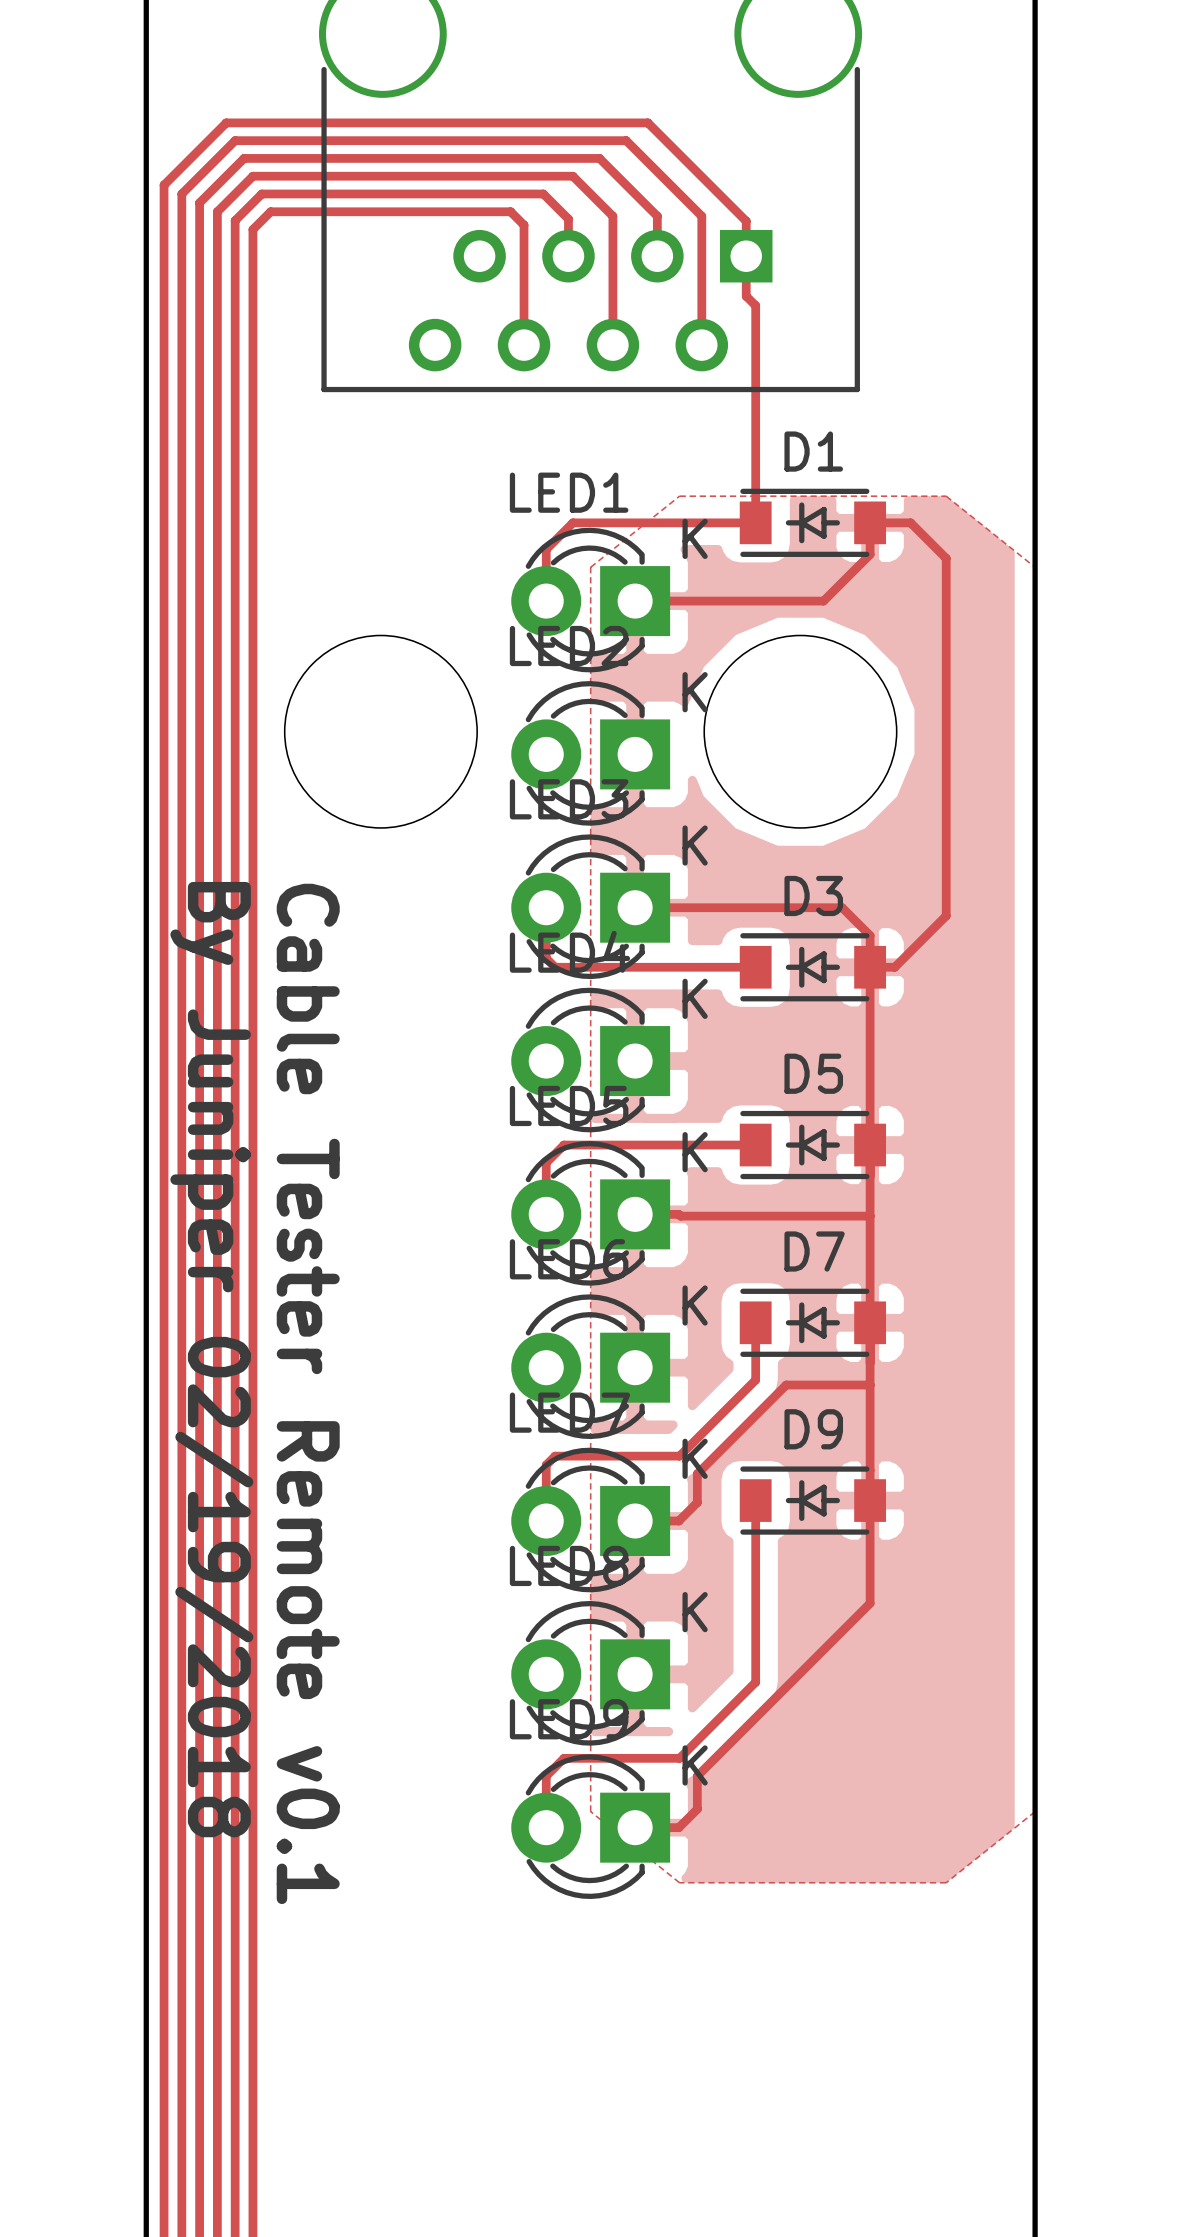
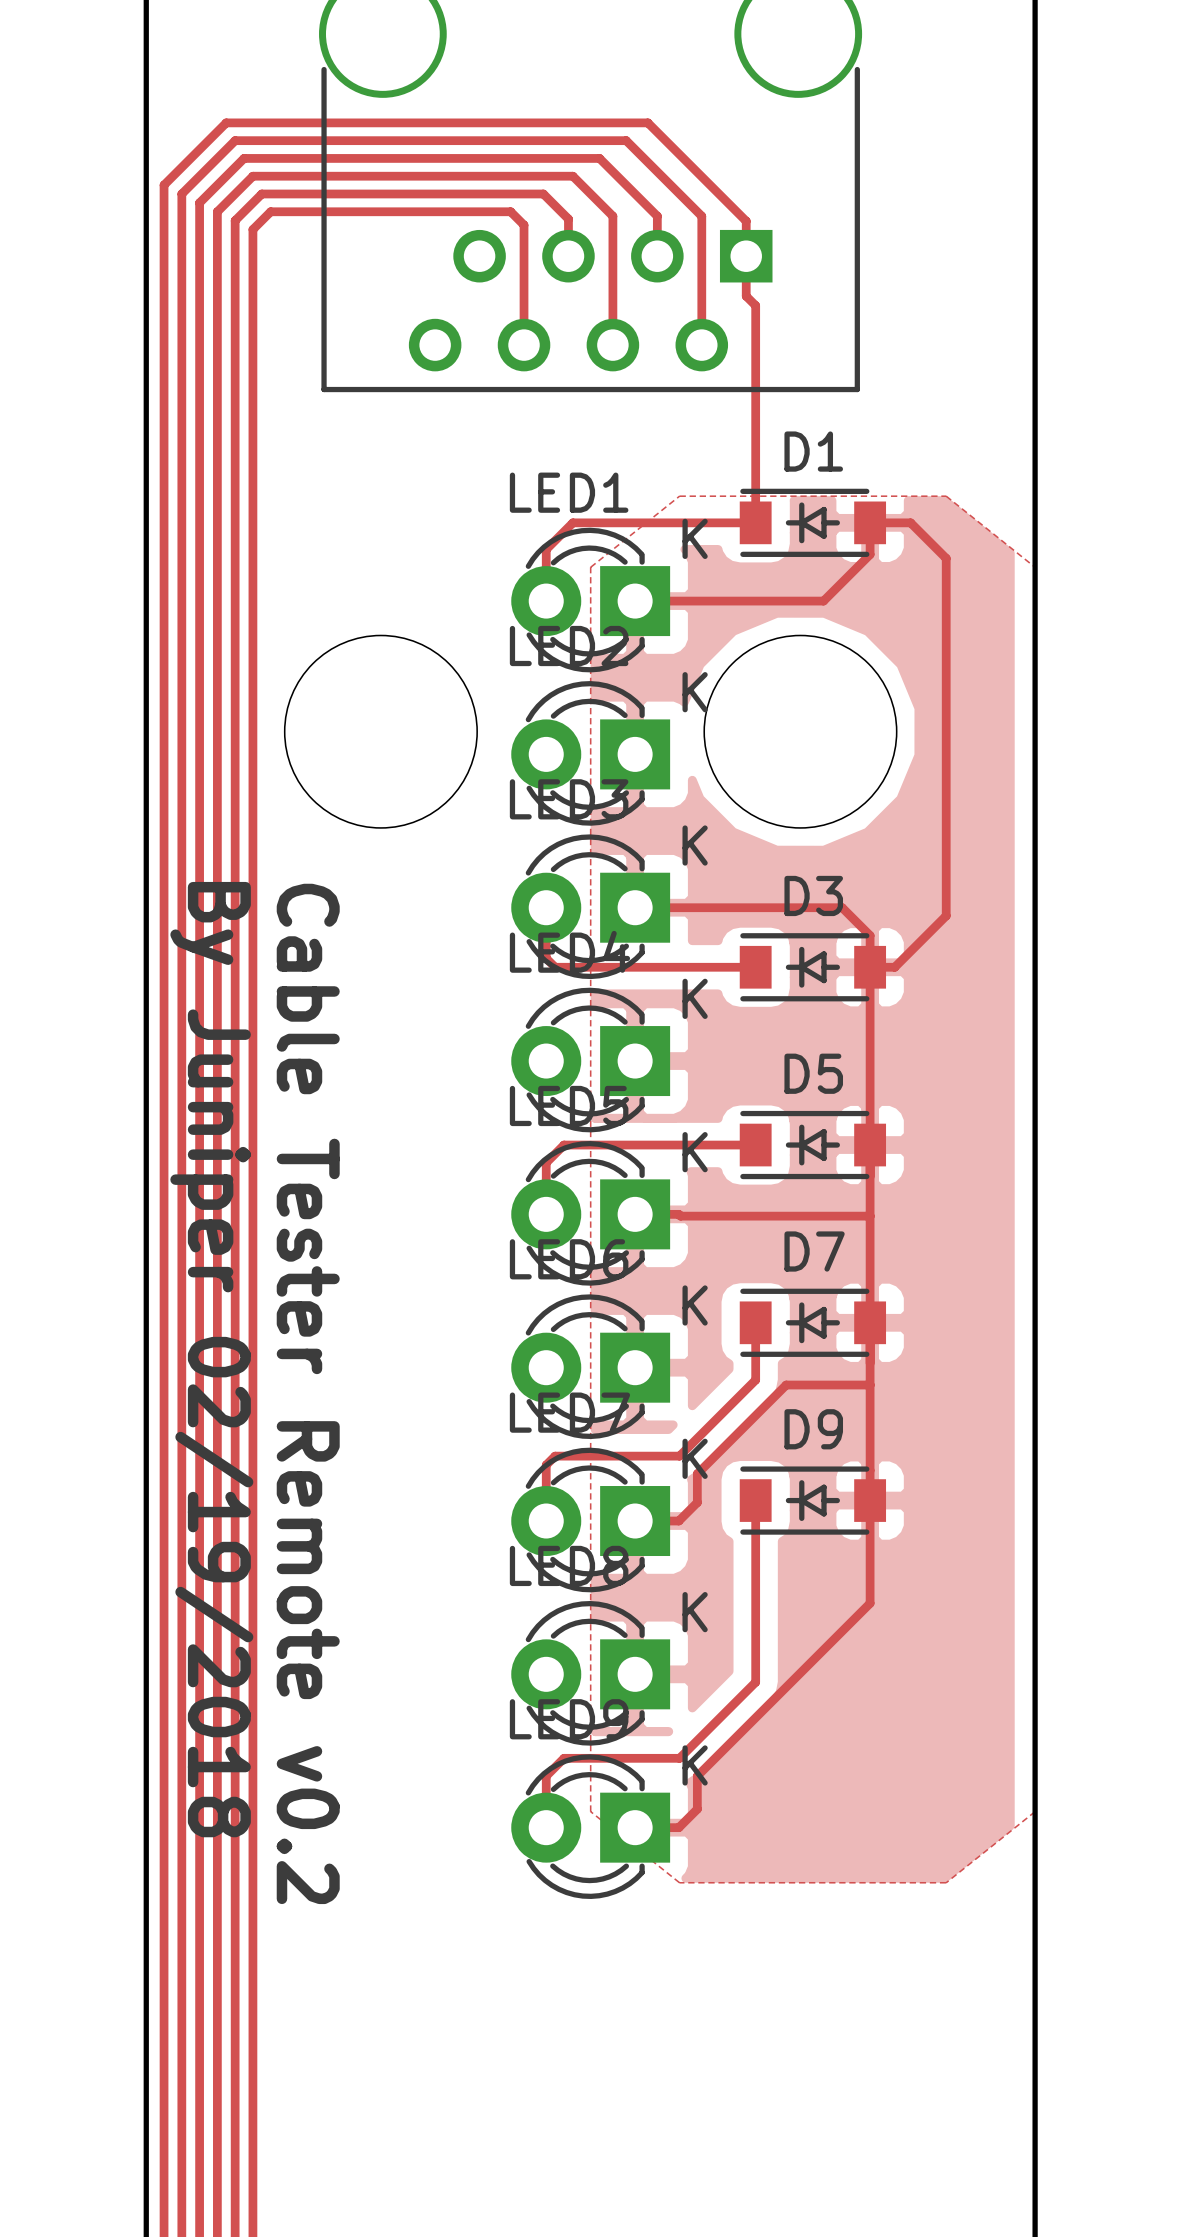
text: Cable Tester Remote v0.1 (308, 1393) -> Cable Tester Remote v0.2 (308, 1393)

